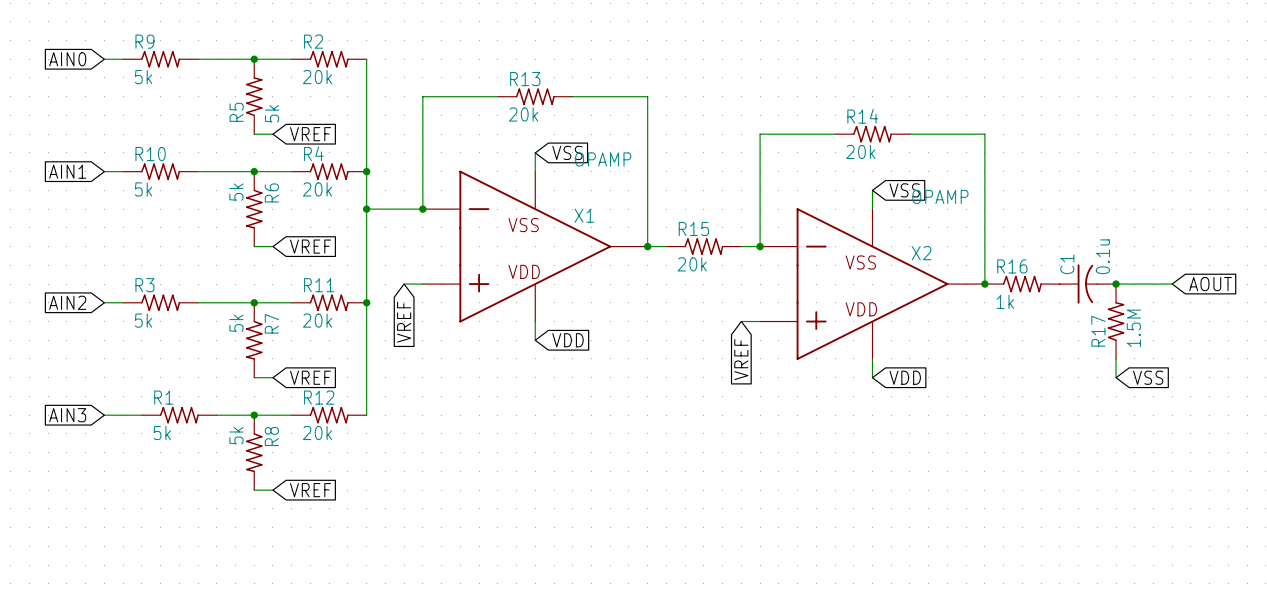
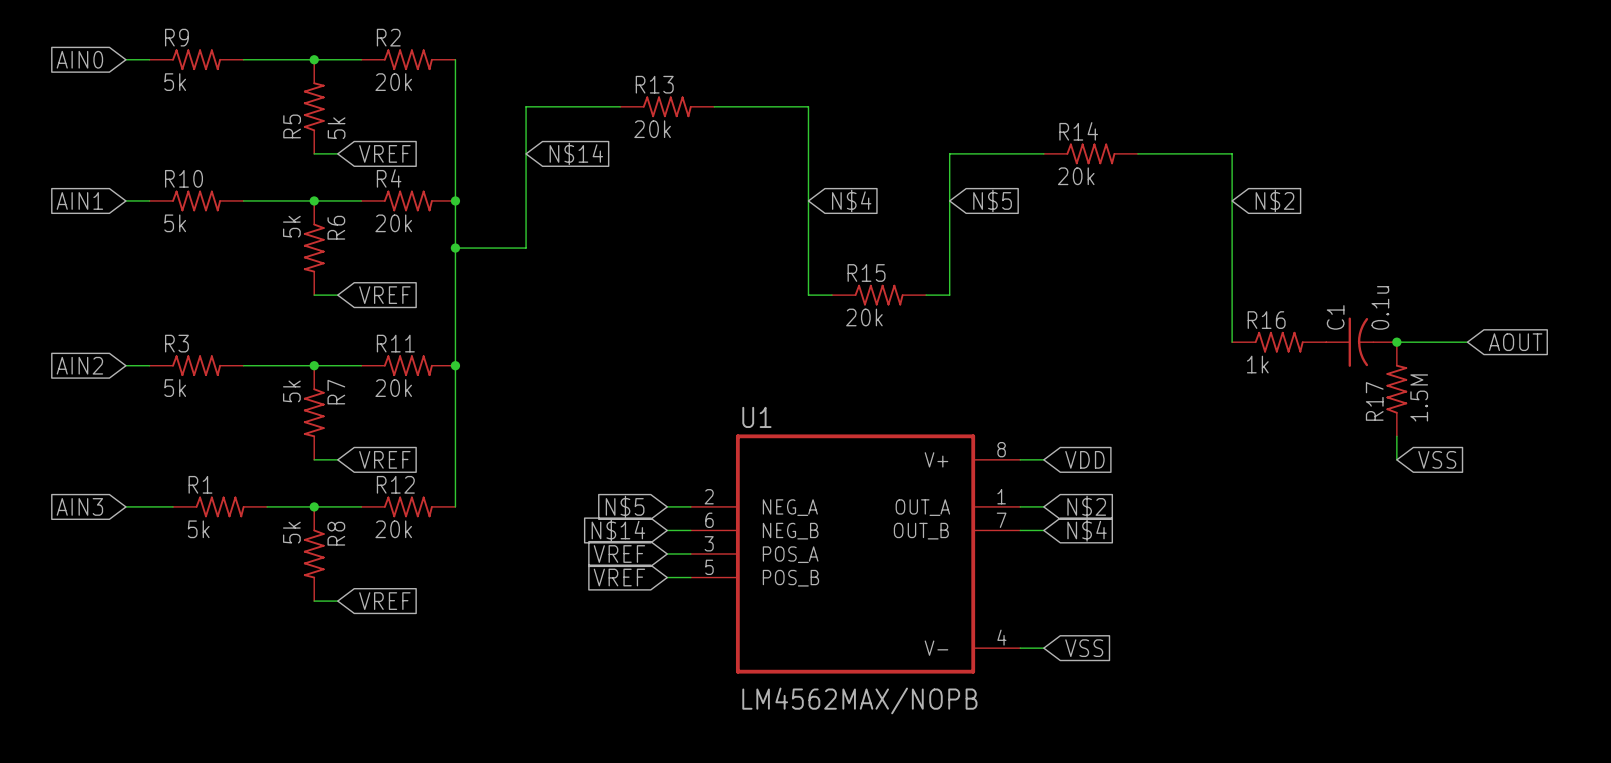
global label: none -> N$14 (576, 153)
wire: (535, 152) (535, 171) -> none
global label: VSS (567, 152) -> none
global label: none -> N$4 (851, 200)
global label: none -> N$5 (992, 200)
global label: none -> N$2 (1274, 200)
wire: (872, 190) (872, 209) -> none
global label: VSS (904, 190) -> none
junction: (422, 209) -> none
X1: OPAMP (535, 246) -> none
junction: (647, 246) -> none
junction: (760, 246) -> none
wire: (404, 284) (422, 284) -> none
X2: OPAMP (872, 284) -> none
junction: (984, 284) -> none
wire: (535, 321) (535, 340) -> none
wire: (741, 321) (760, 321) -> (1020, 459) (1043, 459)
global label: VREF (404, 322) -> none
global label: VDD (567, 340) -> none
wire: (872, 358) (872, 377) -> none
global label: VREF (741, 359) -> none
global label position: VDD (905, 377) -> VDD (1084, 459)
global label: none -> N$5 (625, 506)
wire: none -> (667, 506) (690, 506)
wire: none -> (1020, 506) (1043, 506)
global label: none -> N$2 (1086, 506)
global label: none -> N$14 (618, 530)
wire: none -> (667, 530) (690, 530)
wire: none -> (1020, 530) (1043, 530)
global label: none -> N$4 (1087, 530)
global label: none -> VREF (619, 554)
wire: none -> (667, 554) (690, 554)
U1: none -> LM4562MAX/NOPB (855, 554)
global label: none -> VREF (619, 577)
wire: none -> (667, 577) (690, 577)
wire: none -> (1020, 648) (1043, 648)
global label: none -> VSS (1084, 648)

